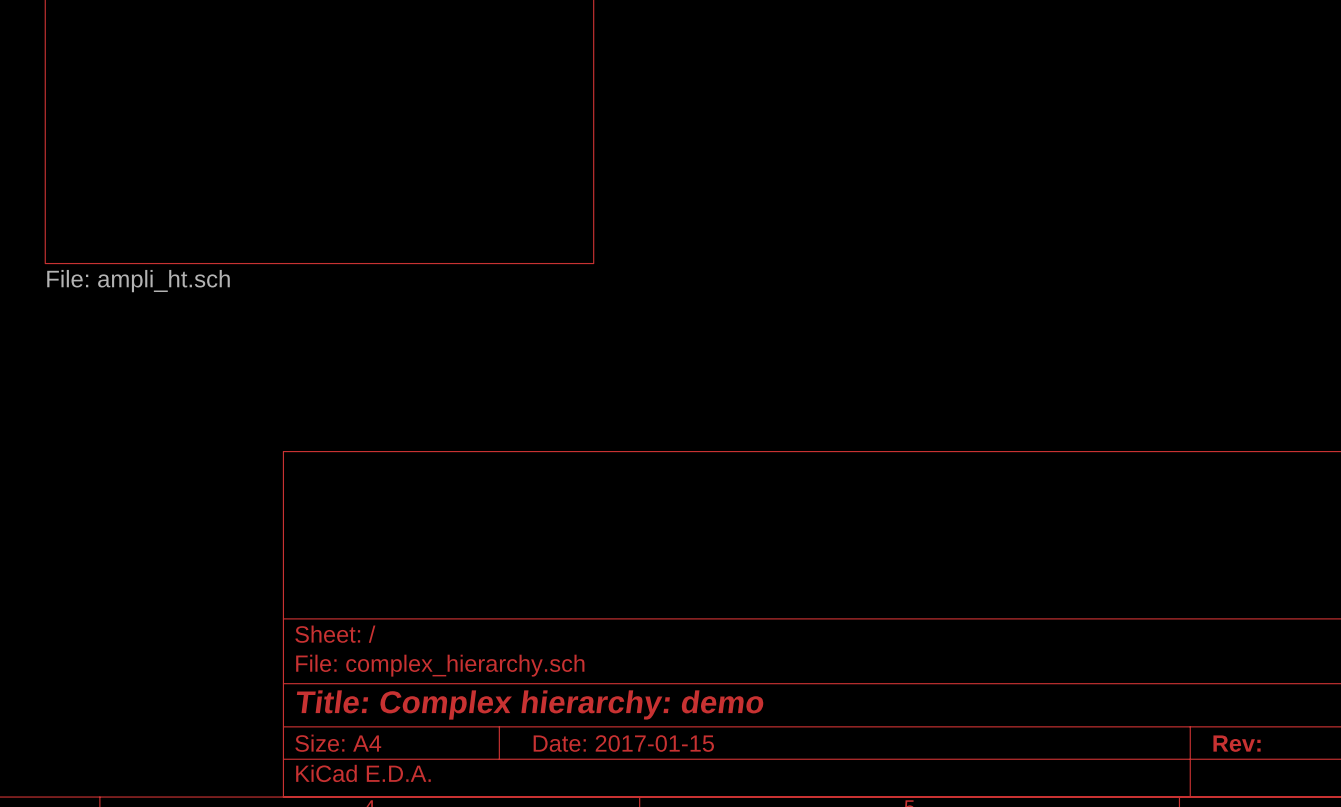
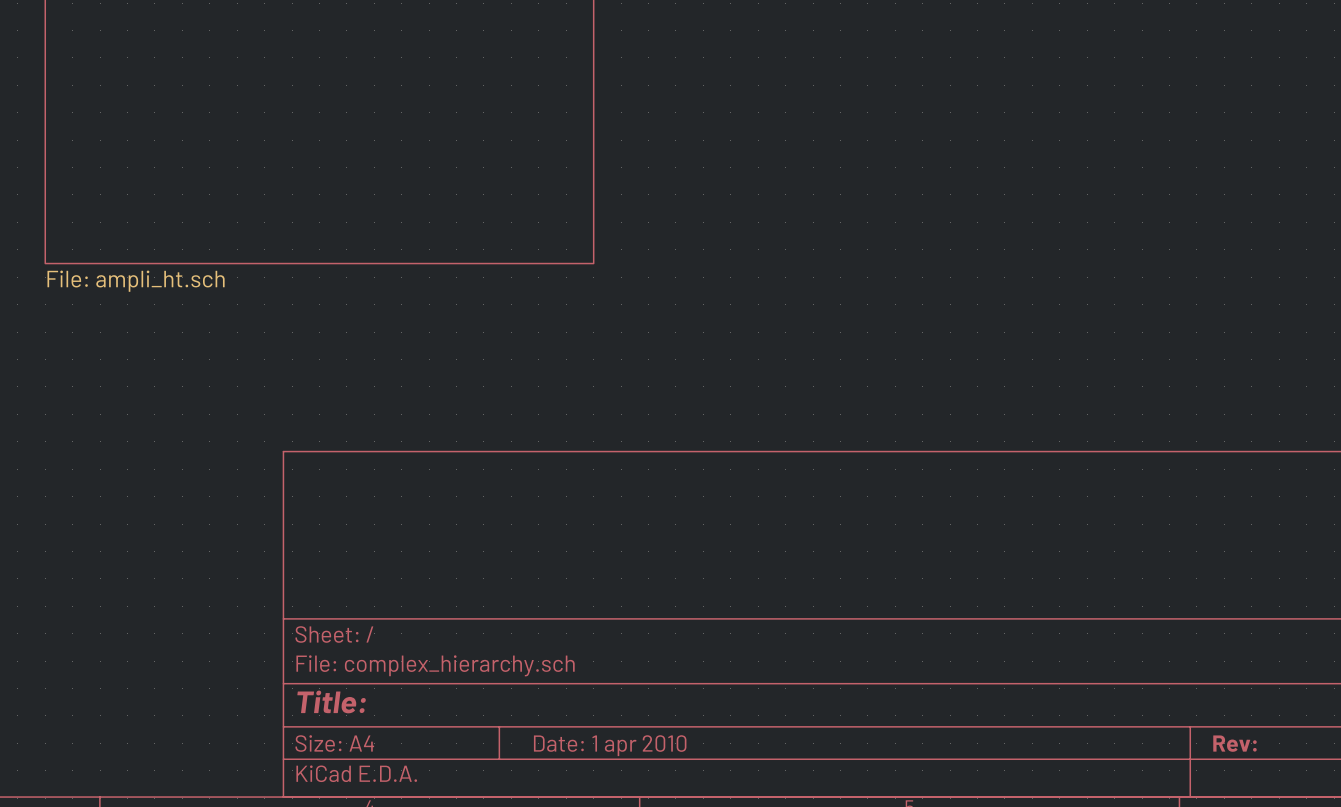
title block: Title: Complex hierarchy: demo (530, 704) -> Title: (331, 701)
title block: Date: 2017-01-15 (623, 743) -> Date: 1 apr 2010 (610, 745)

